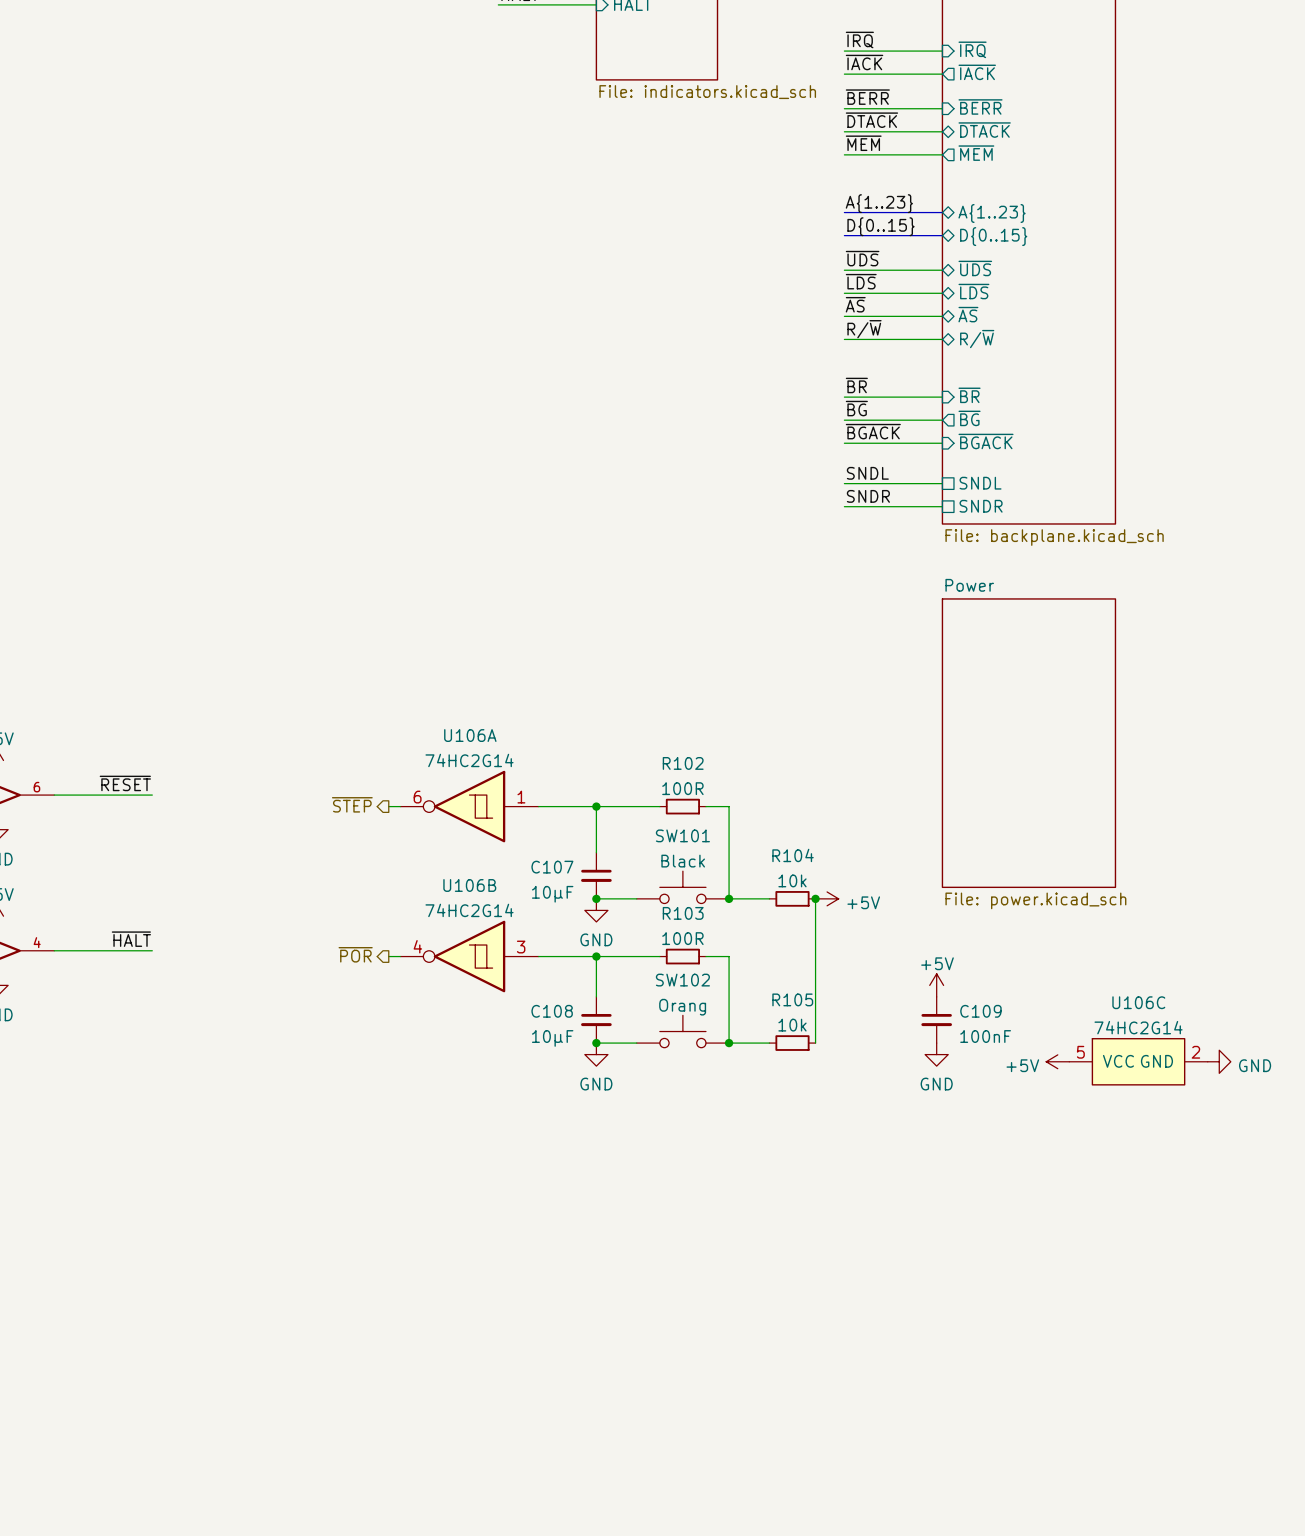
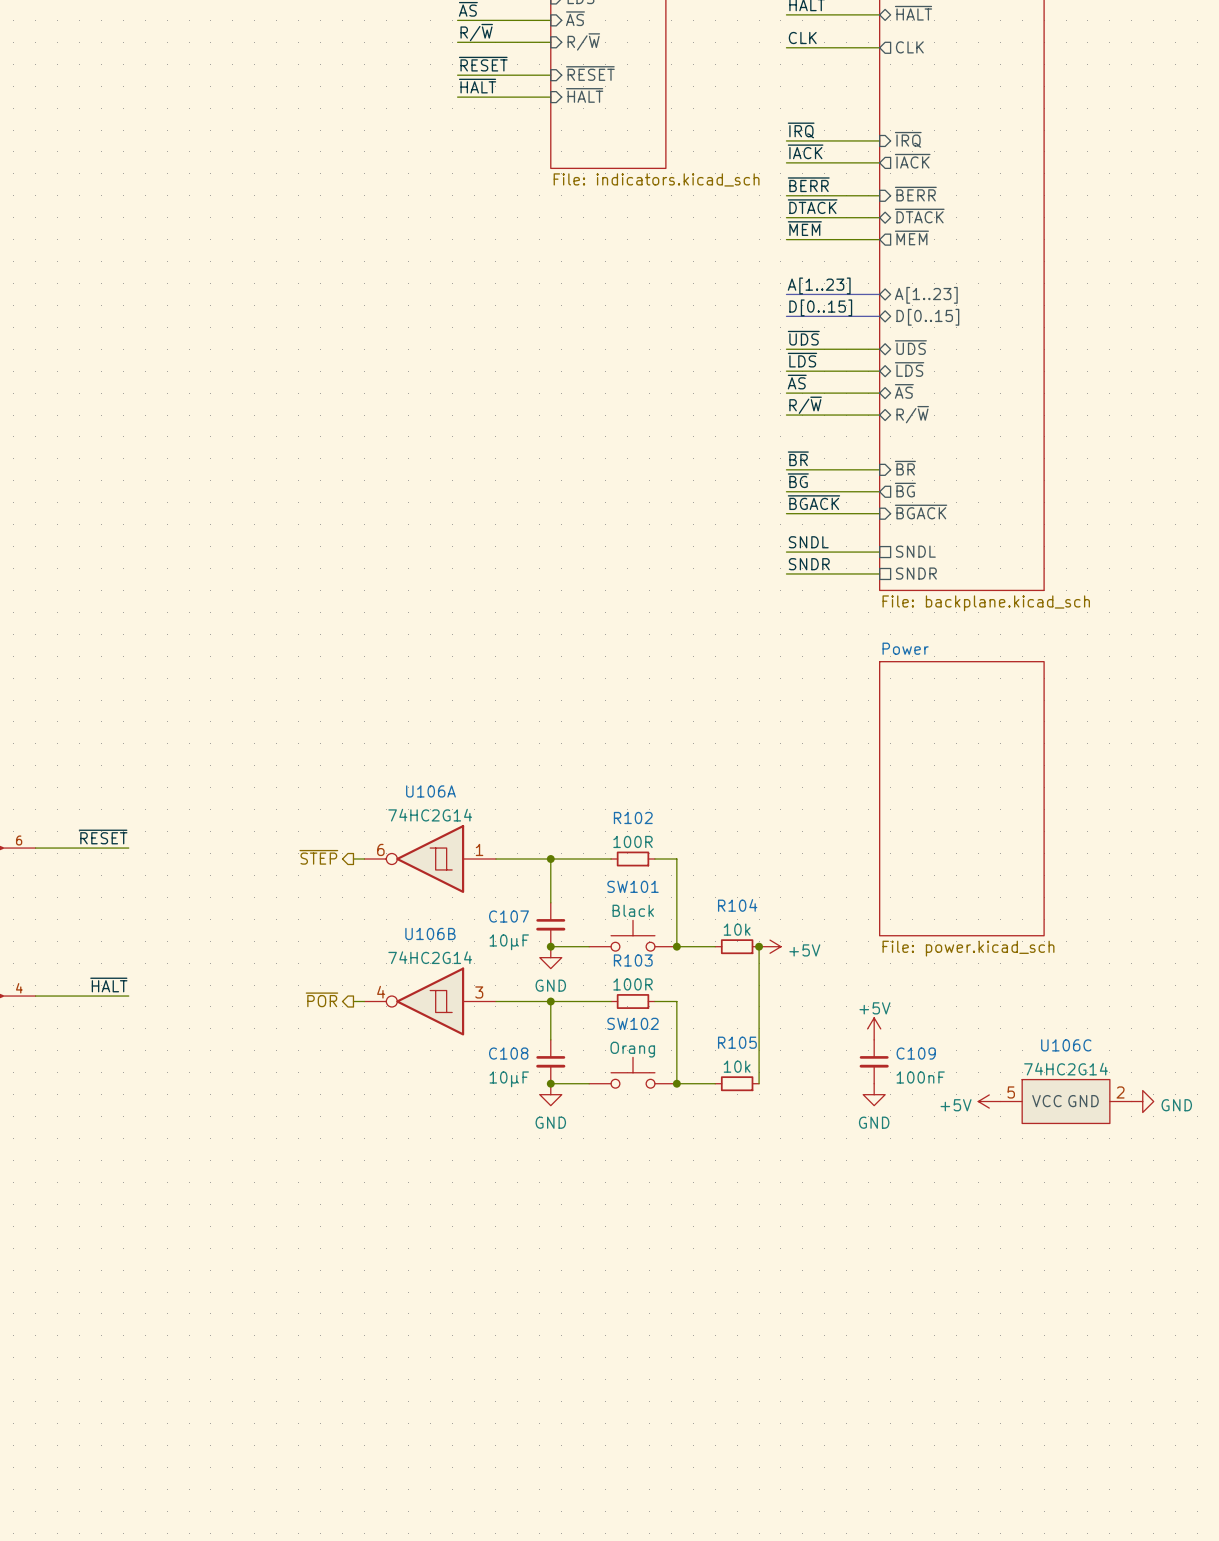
label: A{1..23} (879, 203) -> A[1..23] (819, 285)
sheet pin: A{1..23} (992, 213) -> A[1..23] (926, 295)
label: D{0..15} (881, 226) -> D[0..15] (820, 307)
sheet pin: D{0..15} (993, 236) -> D[0..15] (927, 317)

